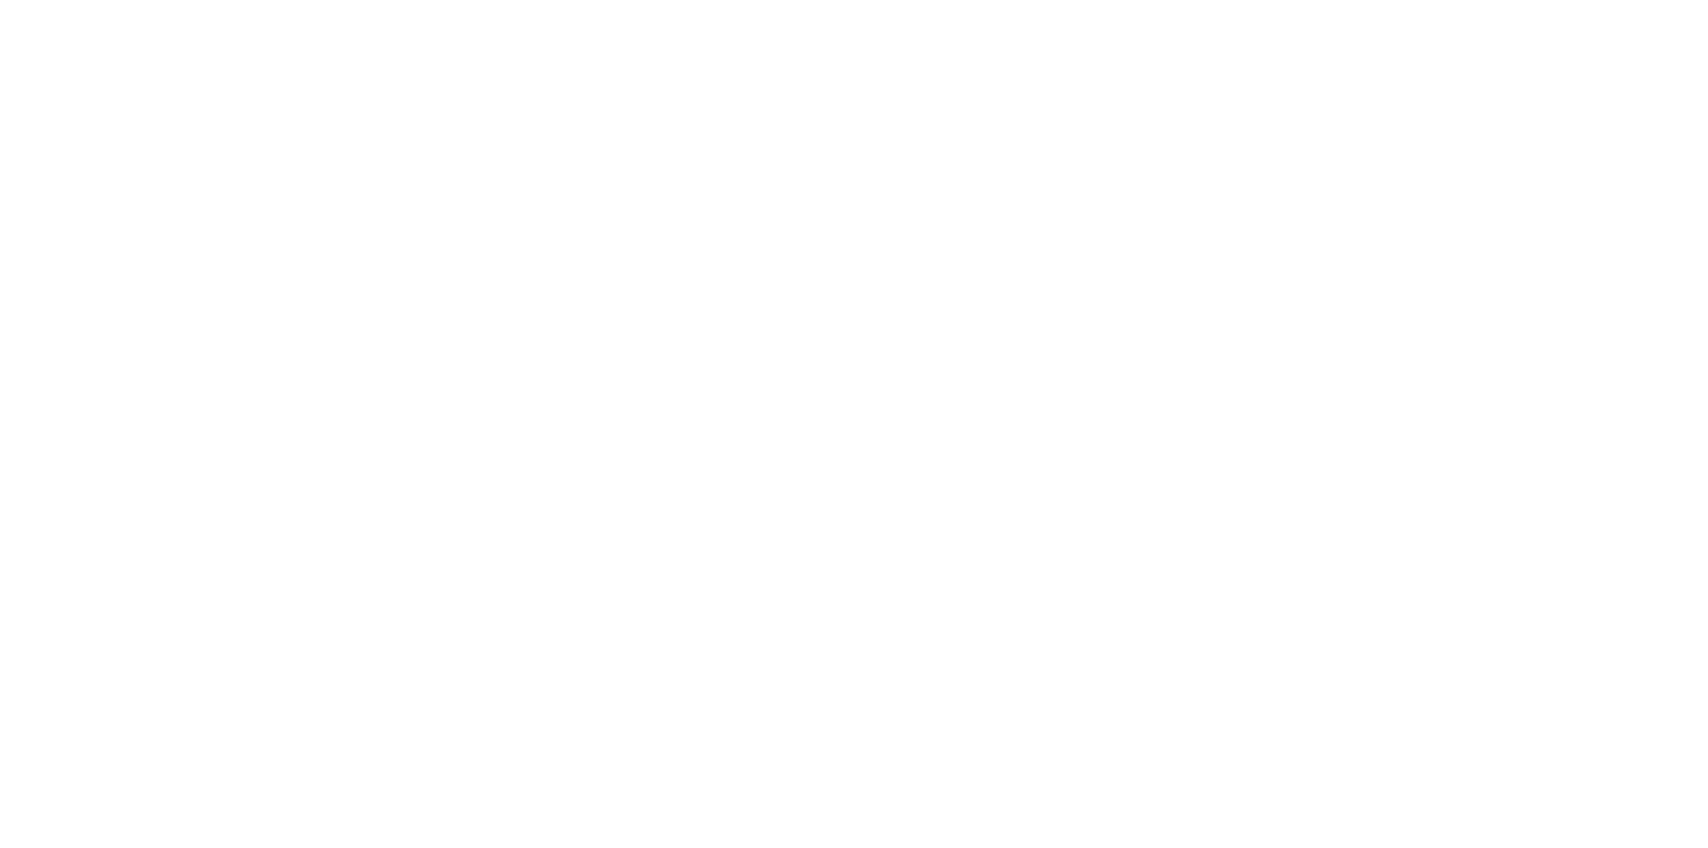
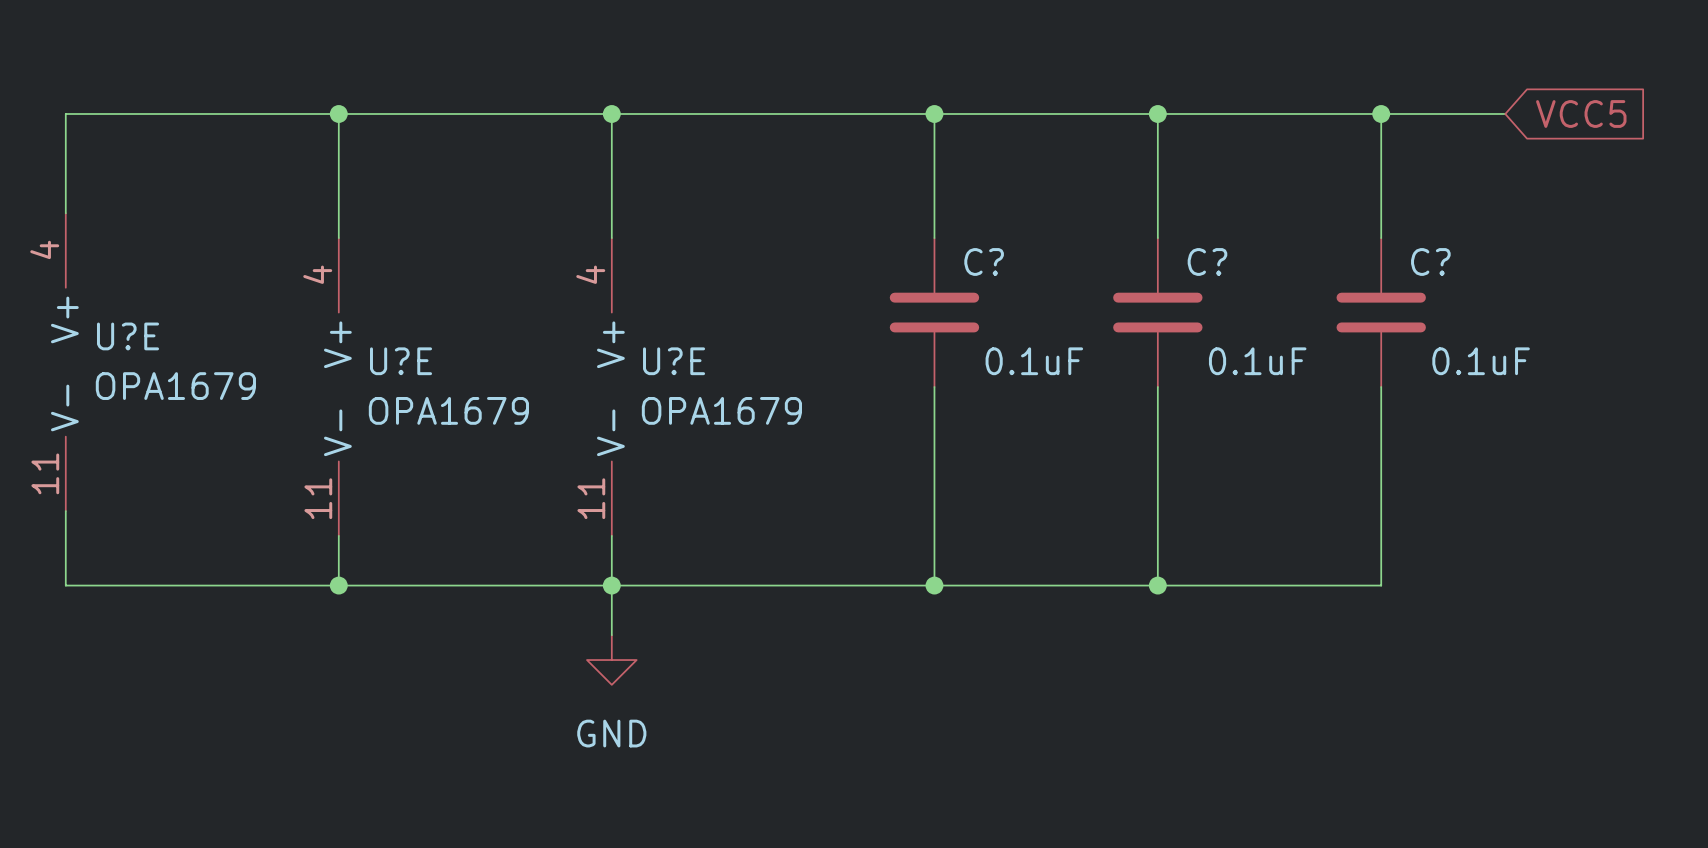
wire: none -> (338, 113) (338, 238)
junction: none -> (338, 113)
wire: none -> (611, 113) (611, 238)
junction: none -> (611, 113)
wire: none -> (934, 113) (934, 238)
junction: none -> (934, 113)
wire: none -> (1157, 113) (1157, 238)
junction: none -> (1157, 113)
wire: none -> (1381, 113) (1381, 238)
junction: none -> (1381, 113)
wire: none -> (1505, 113) (65, 113) (65, 213)
global label: none -> VCC5 (1581, 113)
C?: none -> 0.1uF (934, 312)
C?: none -> 0.1uF (1157, 312)
C?: none -> 0.1uF (1381, 312)
U?E: none -> OPA1679 (65, 362)
U?E: none -> OPA1679 (338, 387)
U?E: none -> OPA1679 (611, 387)
wire: none -> (934, 387) (934, 585)
wire: none -> (1157, 387) (1157, 585)
wire: none -> (1381, 387) (1381, 585) (65, 585) (65, 511)
wire: none -> (338, 535) (338, 585)
wire: none -> (611, 535) (611, 635)
junction: none -> (338, 585)
junction: none -> (611, 585)
junction: none -> (934, 585)
junction: none -> (1157, 585)
power symbol: none -> GND (611, 660)

